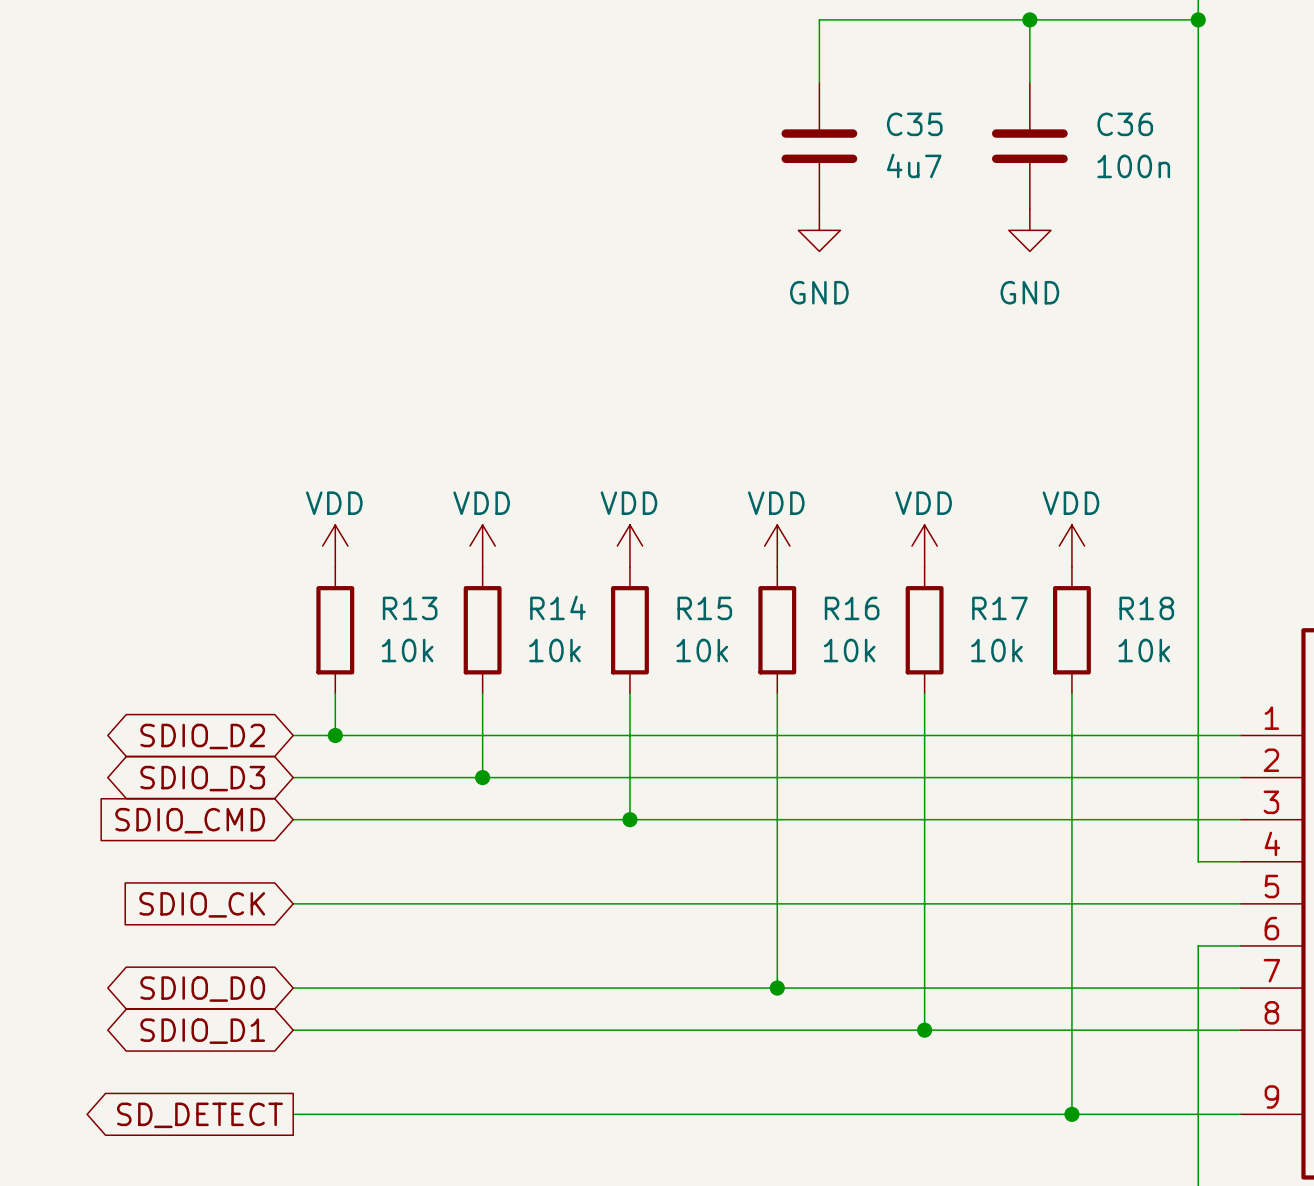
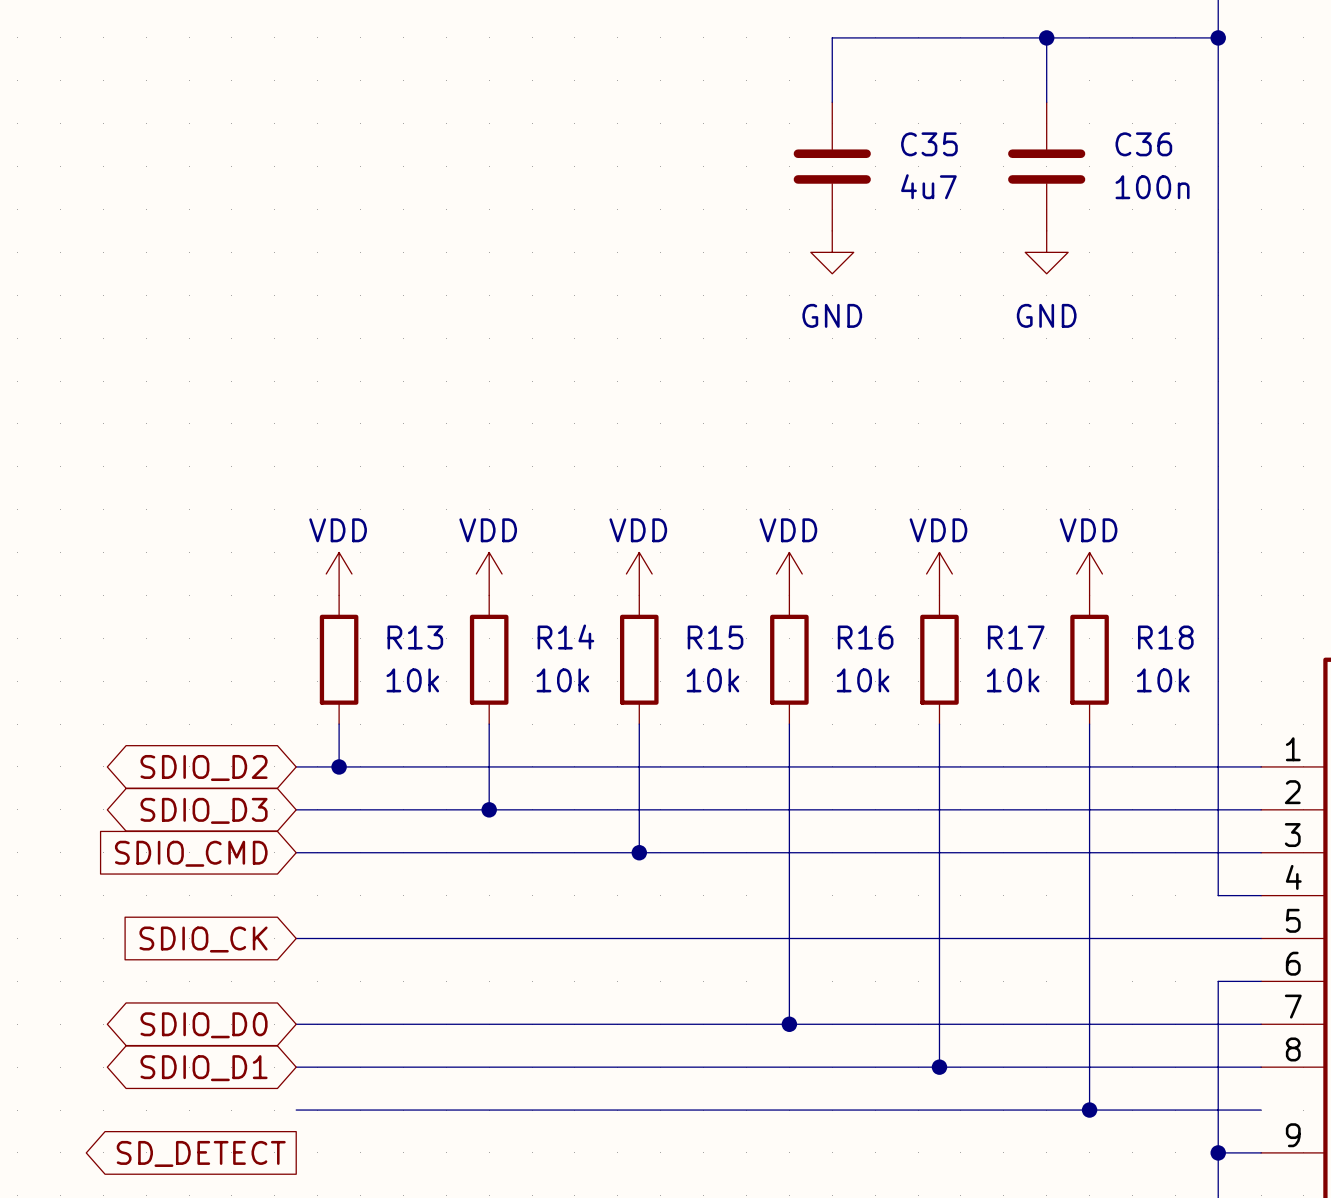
wire: none -> (296, 1110) (1261, 1110)
wire: (1071, 1072) (1071, 1114) -> none
wire: (293, 1114) (1198, 1114) -> none
junction position: (1071, 1114) -> (1089, 1110)
junction: none -> (1218, 1152)

